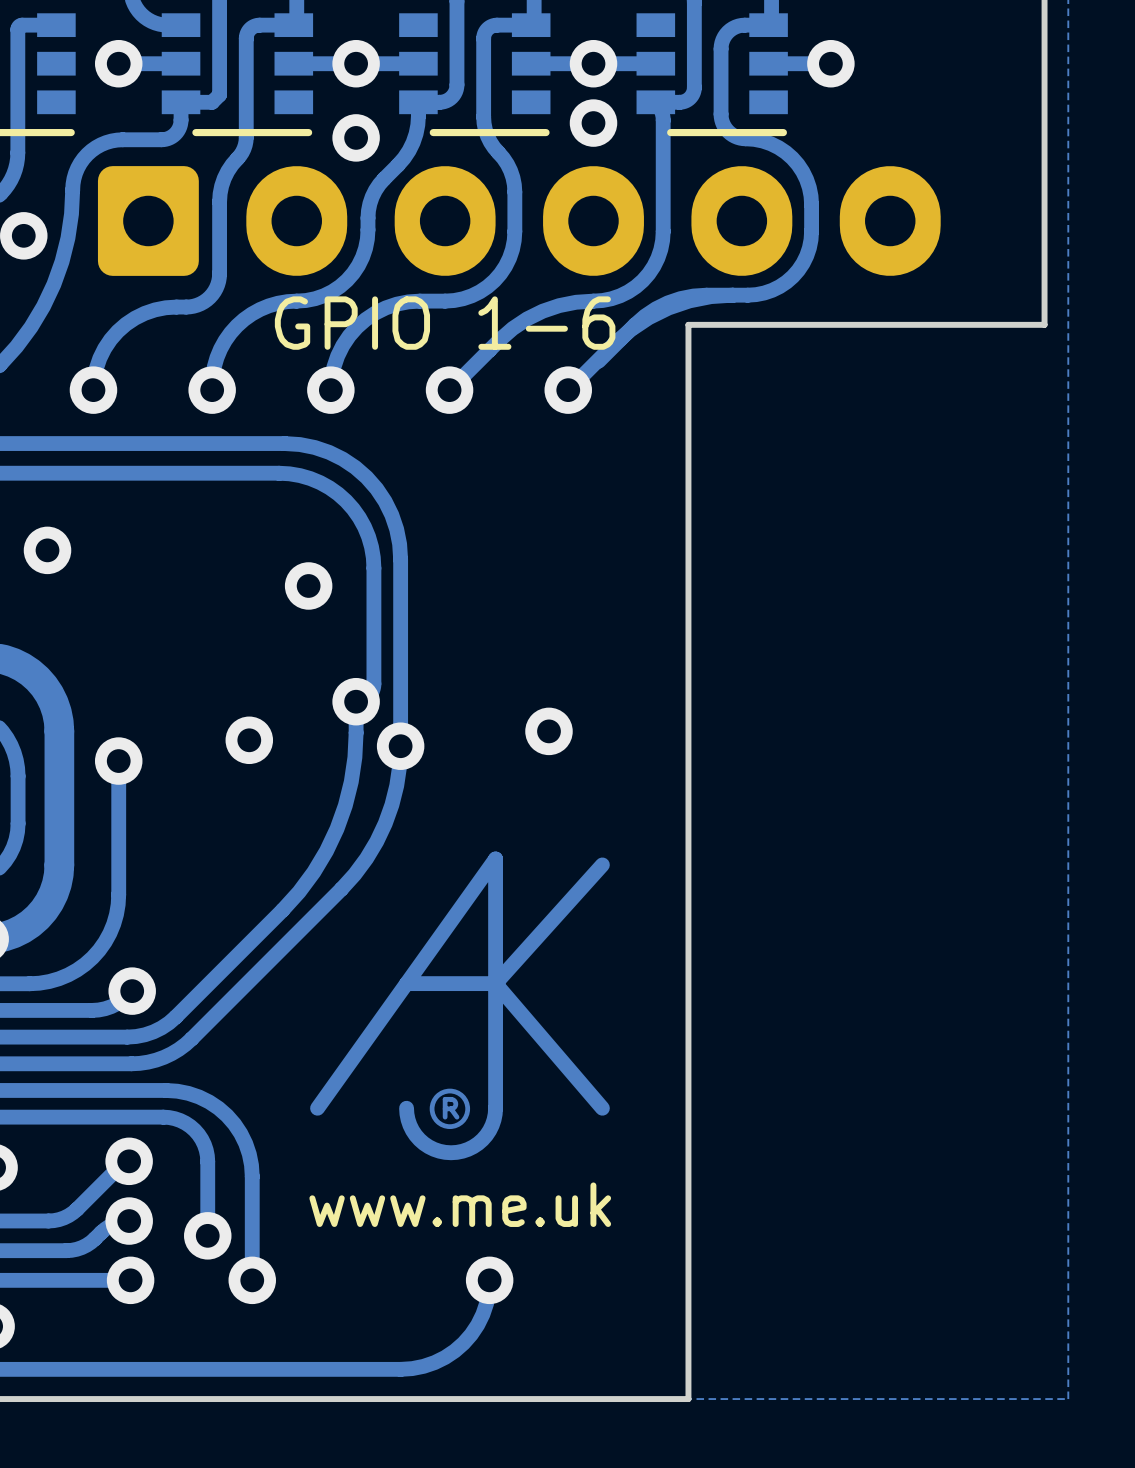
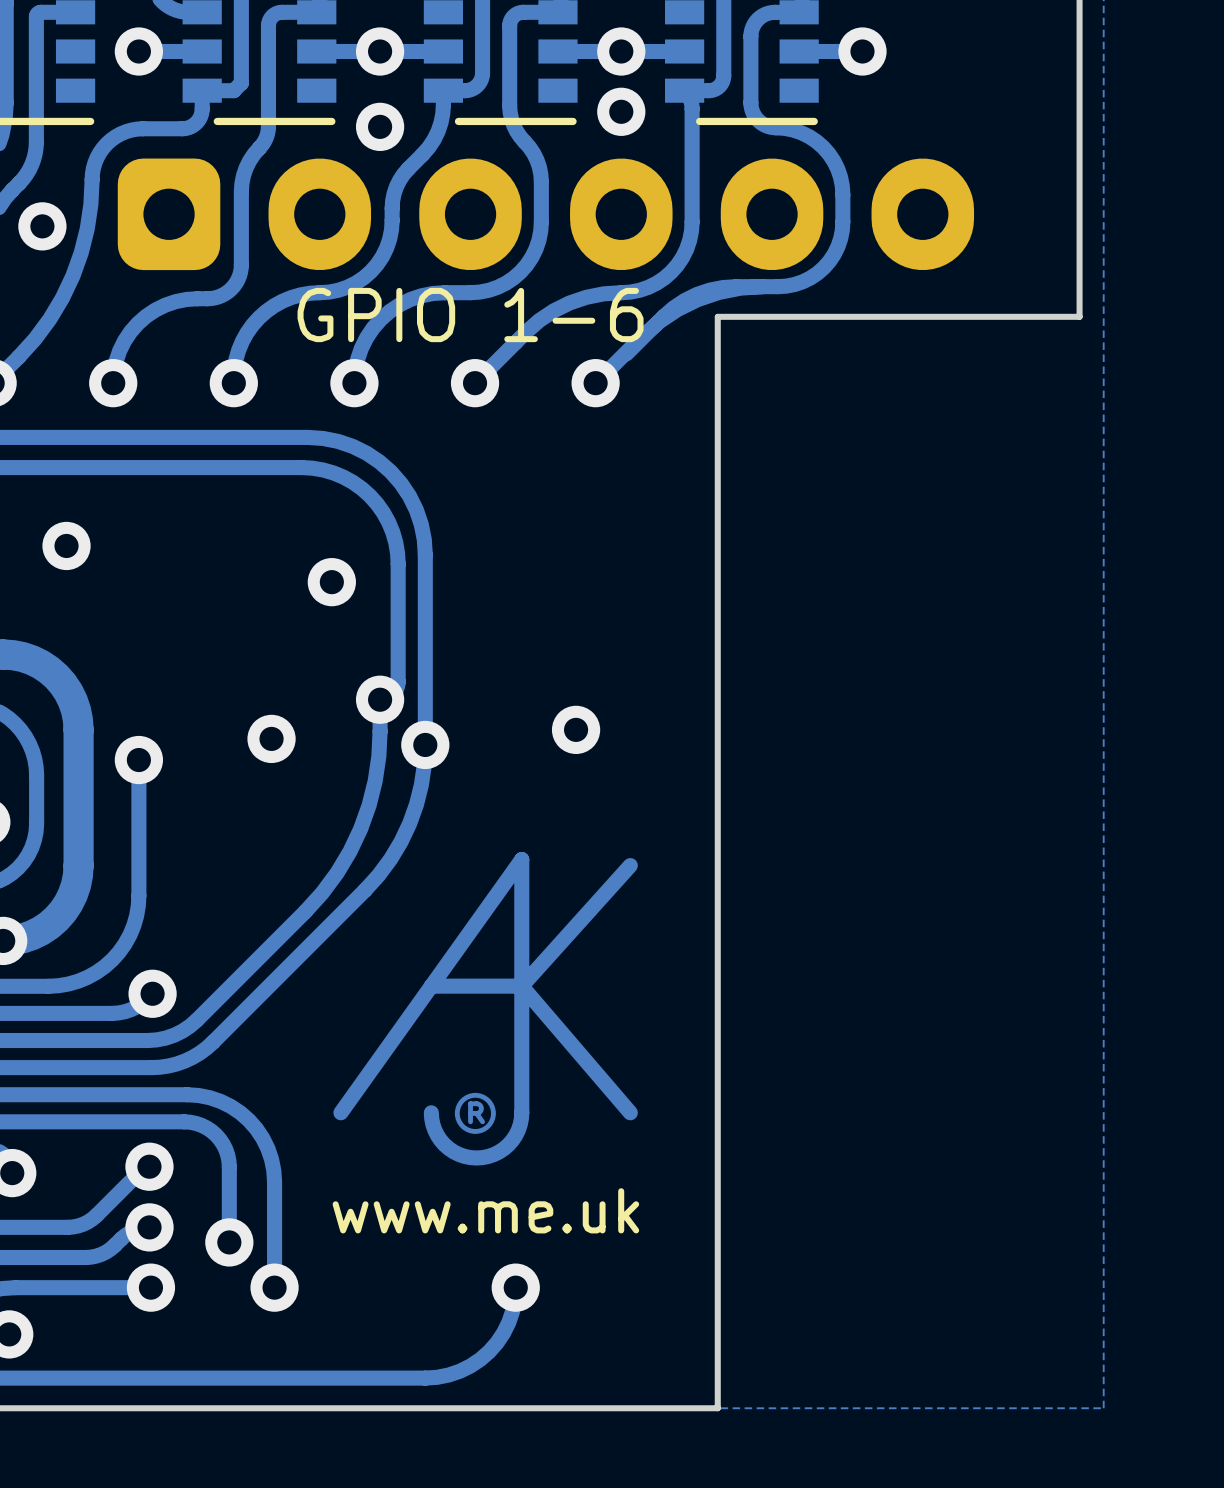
part footprint: [97, 166, 941, 276] -> [117, 158, 975, 271]

